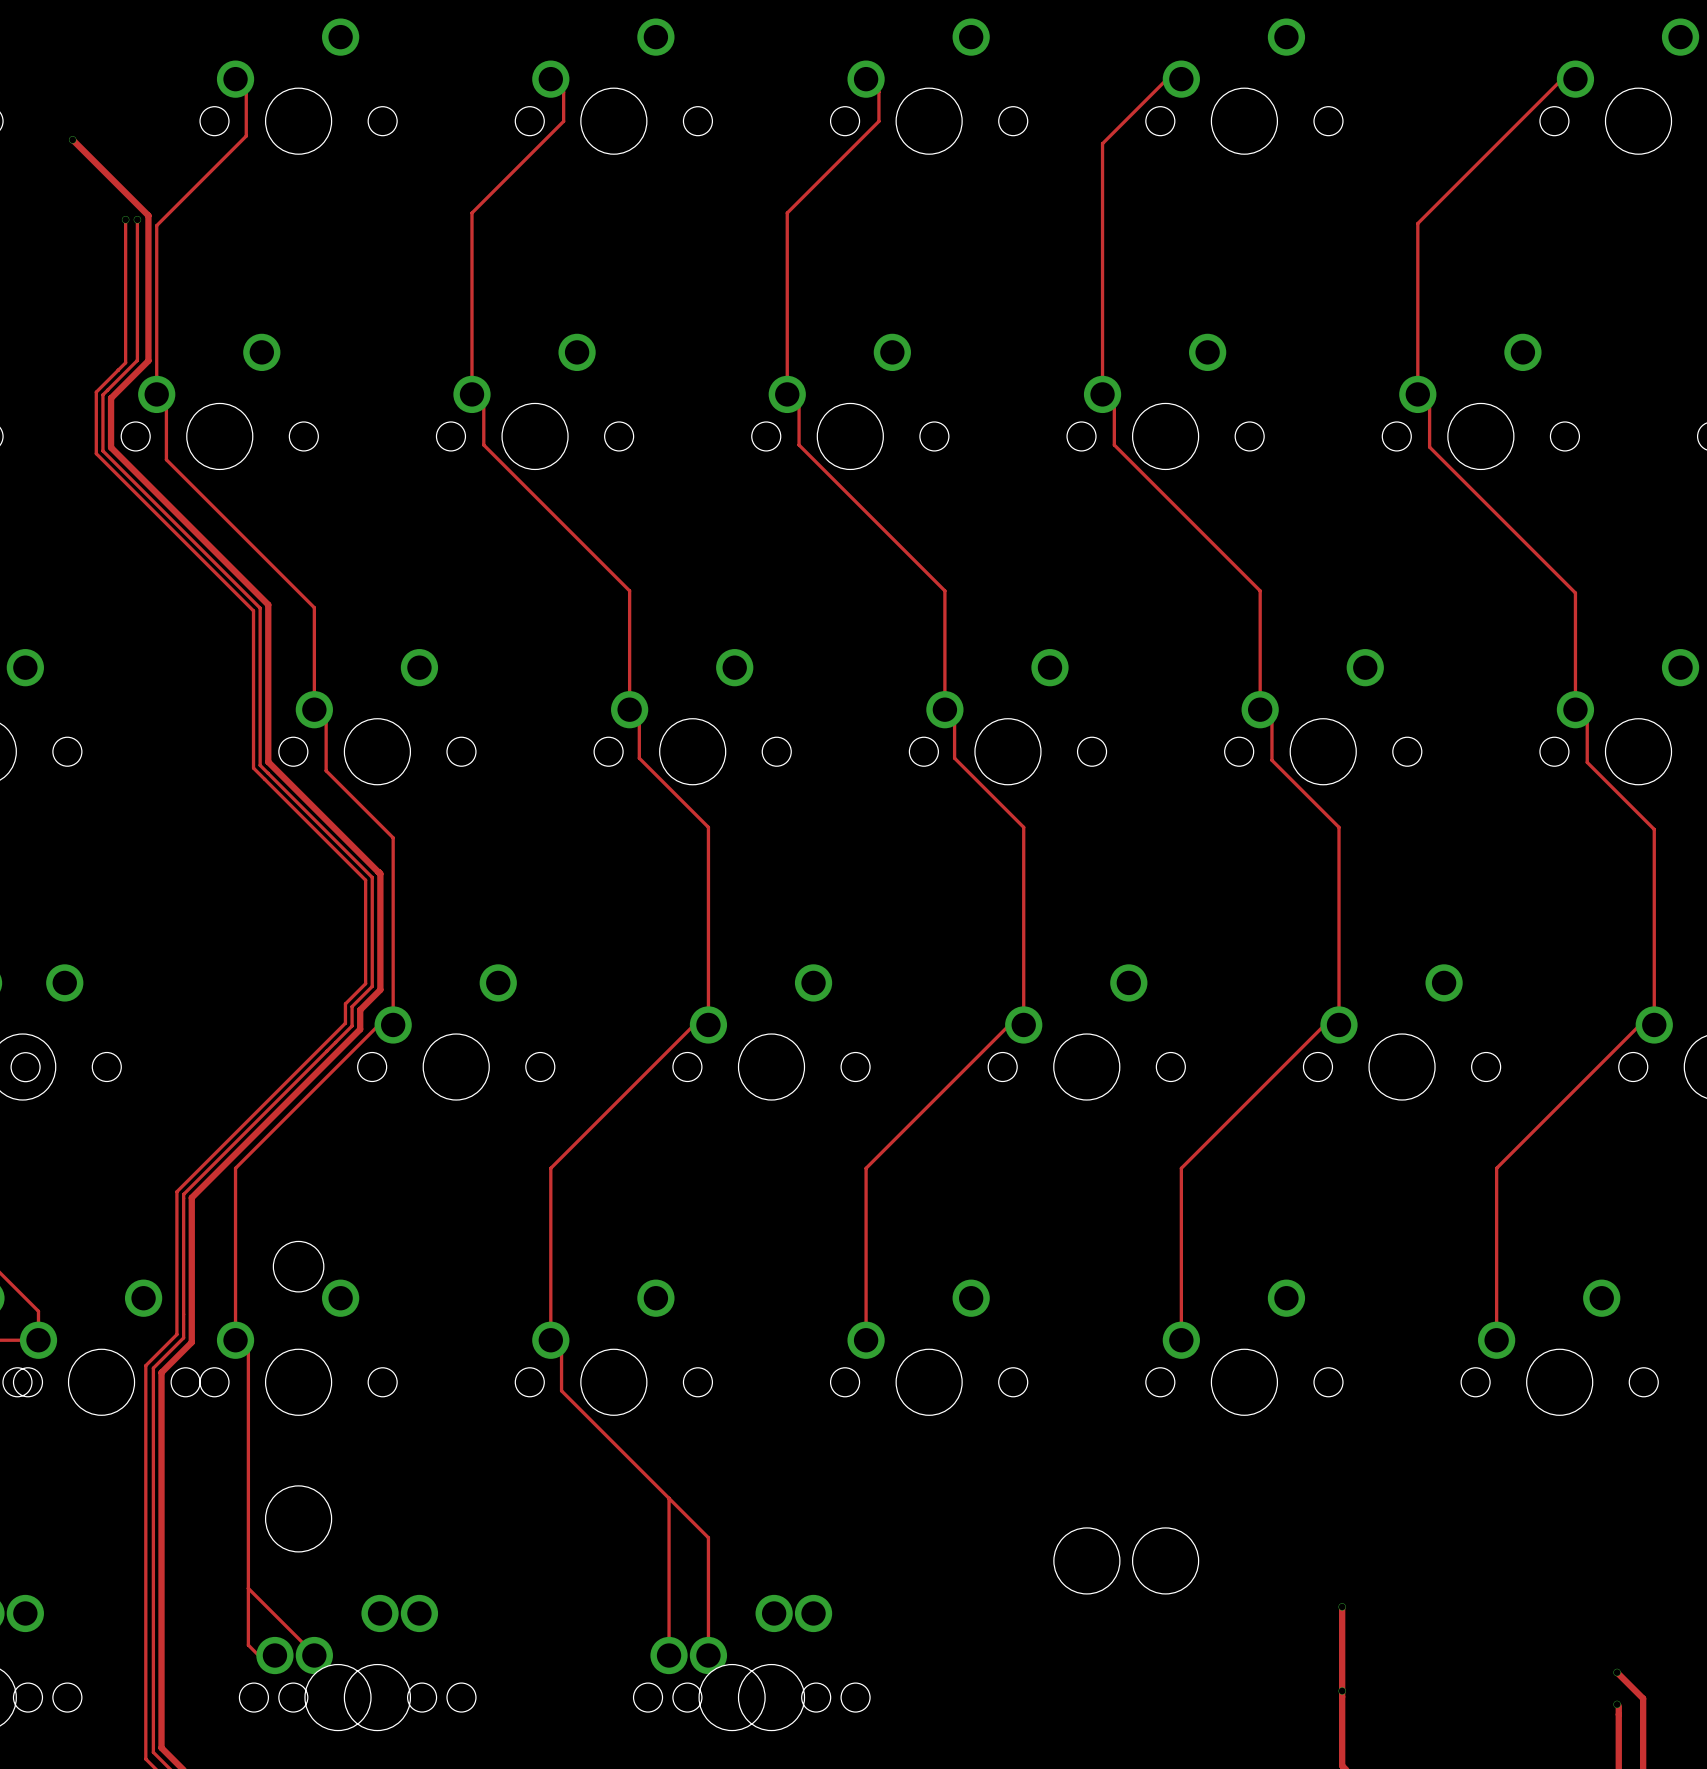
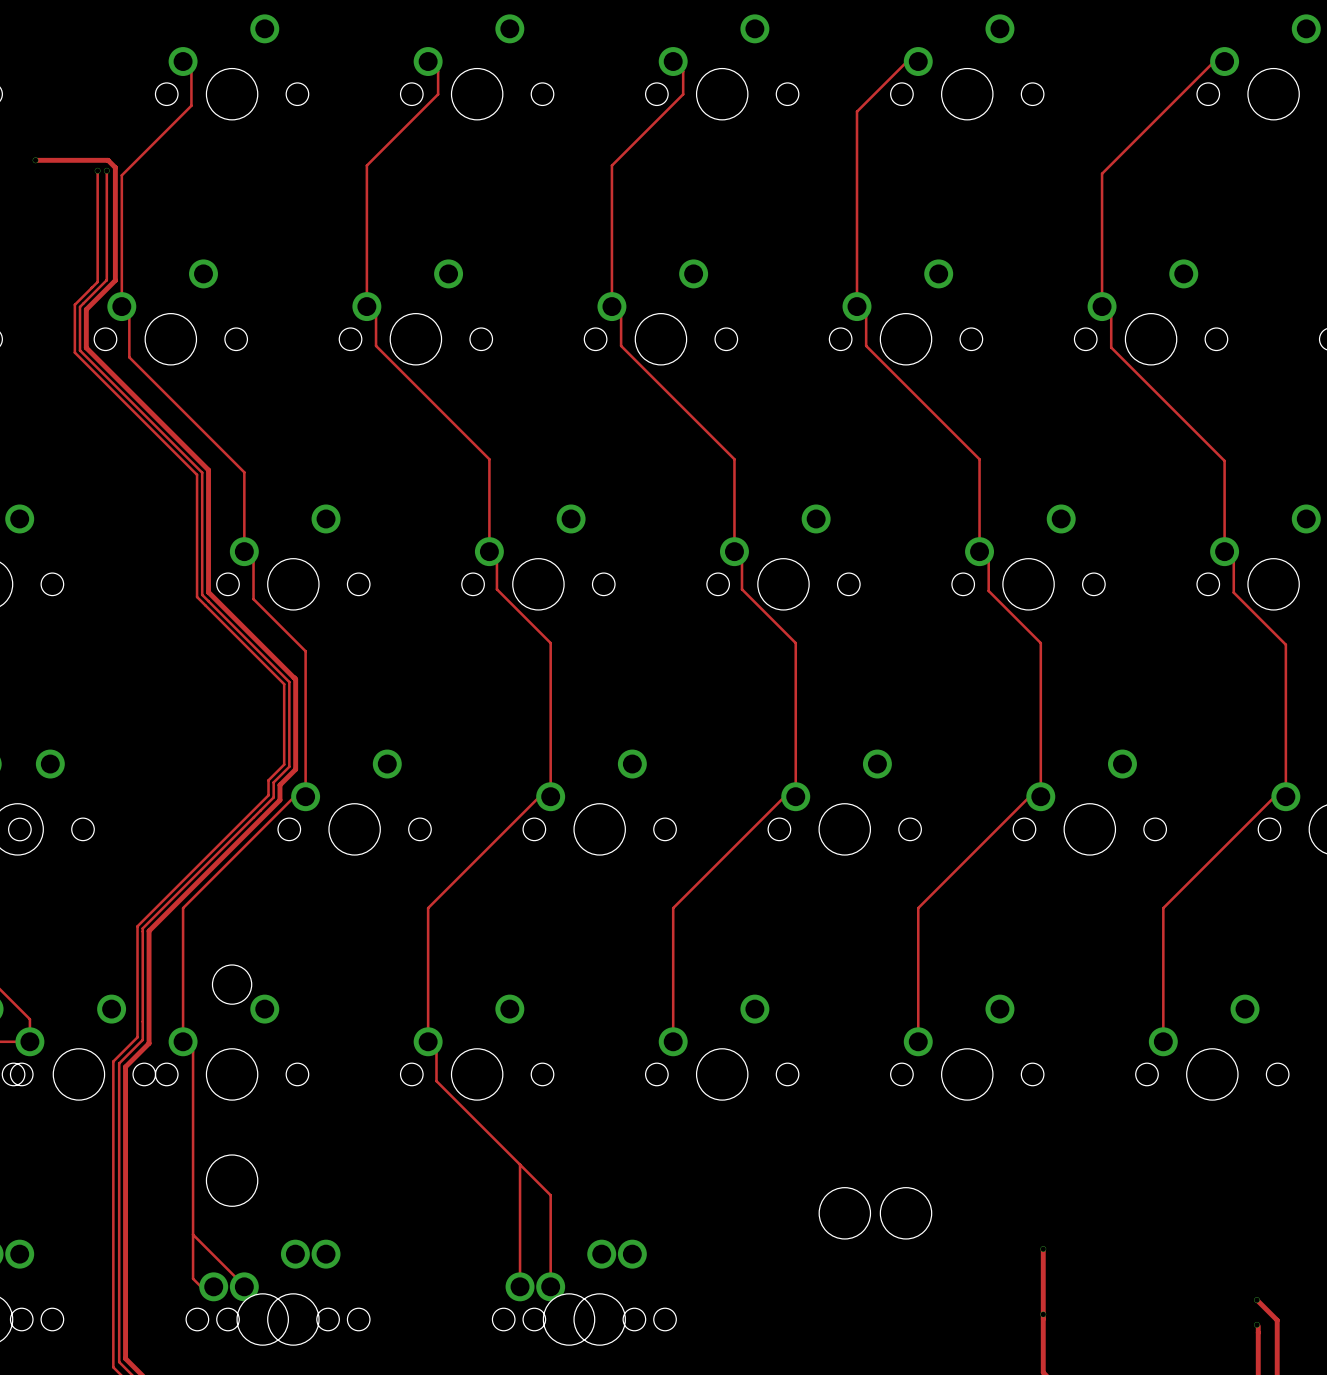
track: (72, 139) (139, 206) -> (35, 160) (108, 160)
via position: (72, 139) -> (35, 160)

